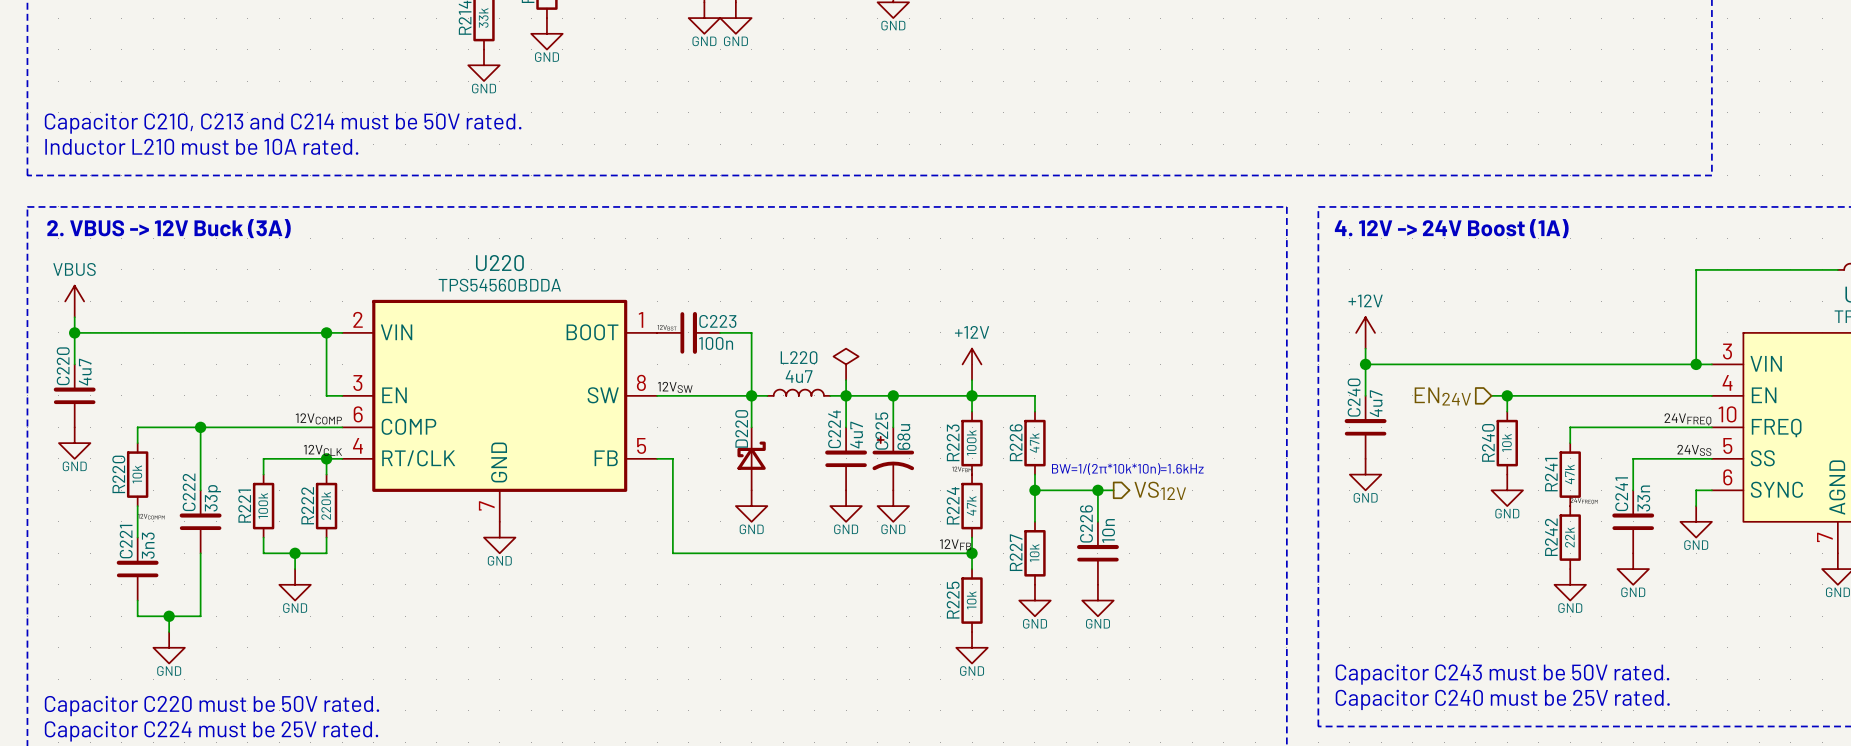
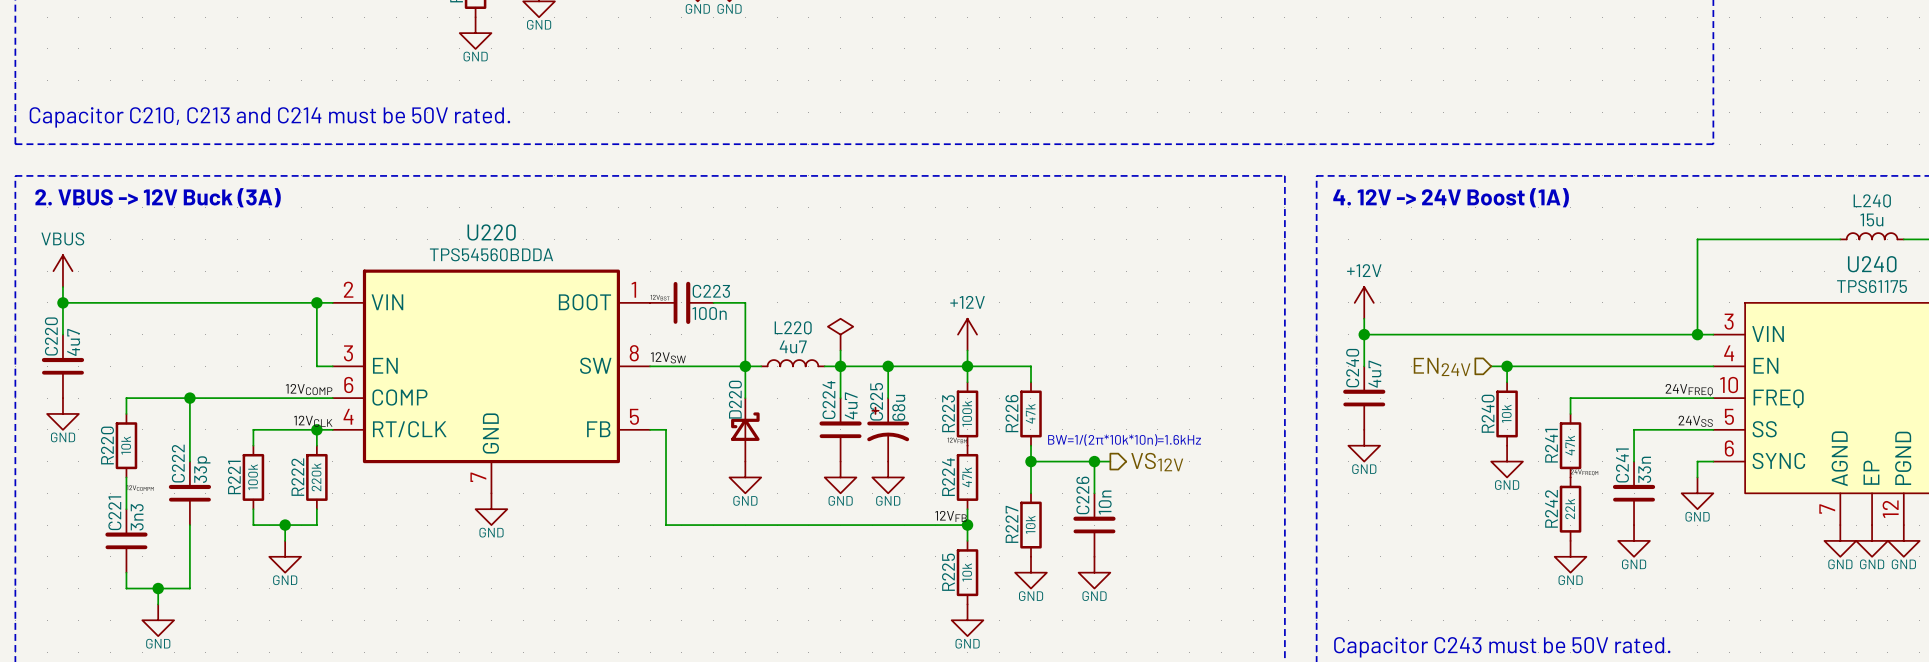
text position: Capacitor C210, C213 and C214 must be 50V rated. (283, 123) -> Capacitor C210, C213 and C214 must be 50V rated. (269, 117)
text: Inductor L210 must be 10A rated. (201, 146) -> none

